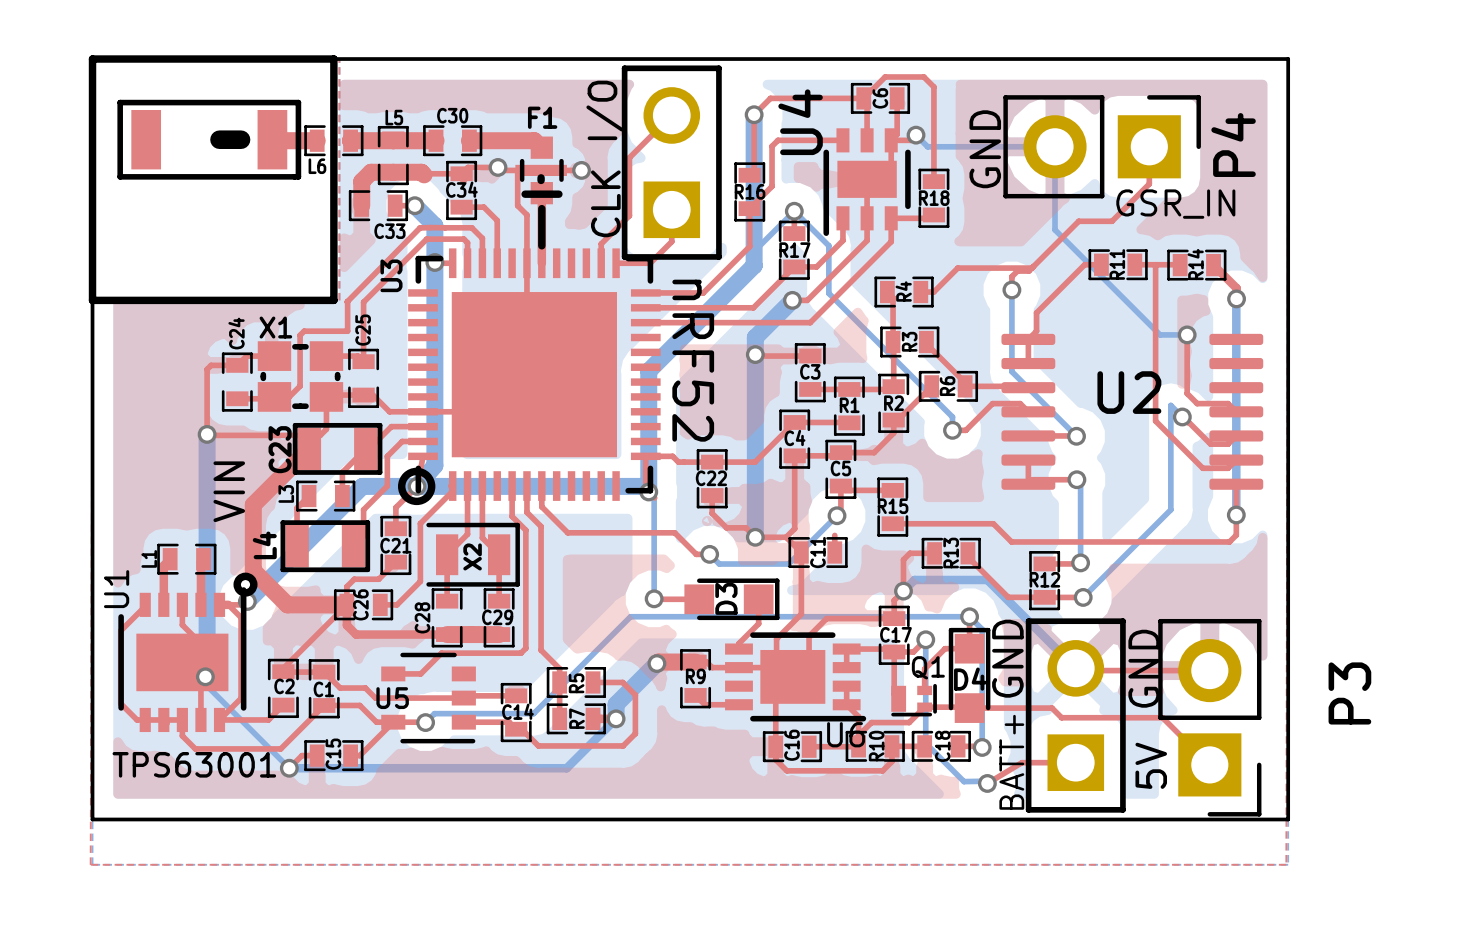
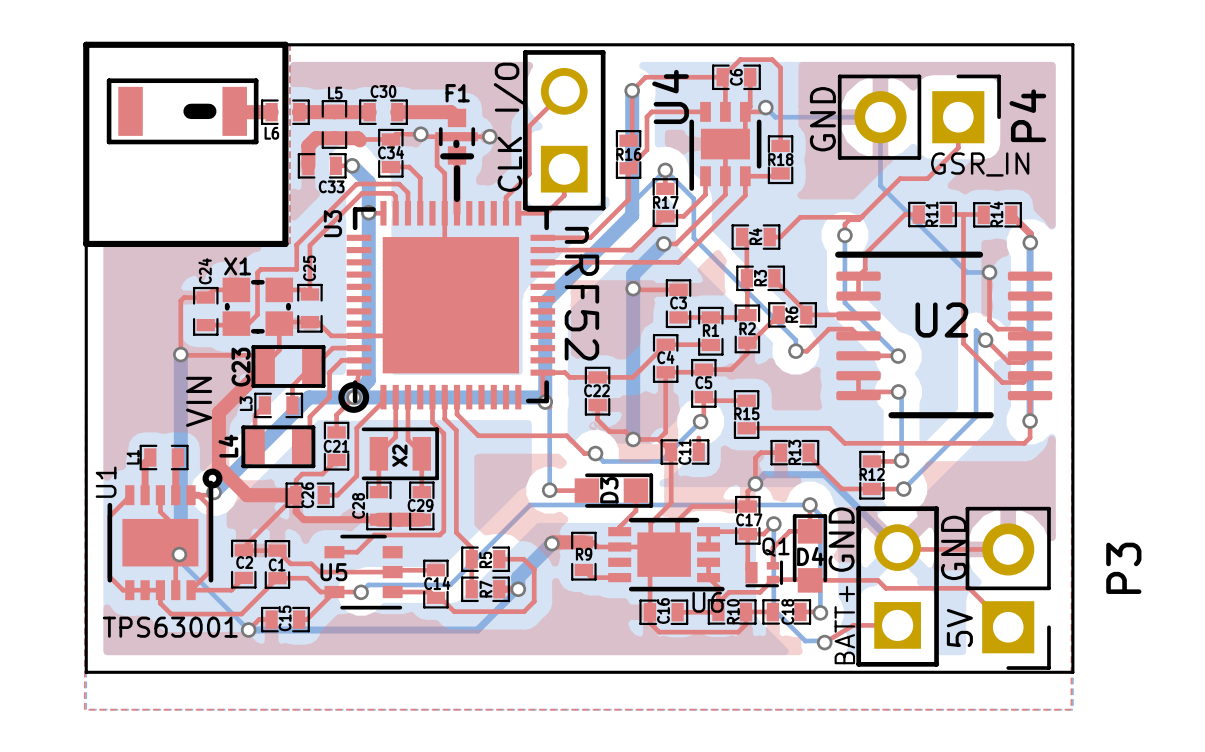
line: none -> (838, 254) (980, 254)
line: none -> (891, 415) (990, 415)

